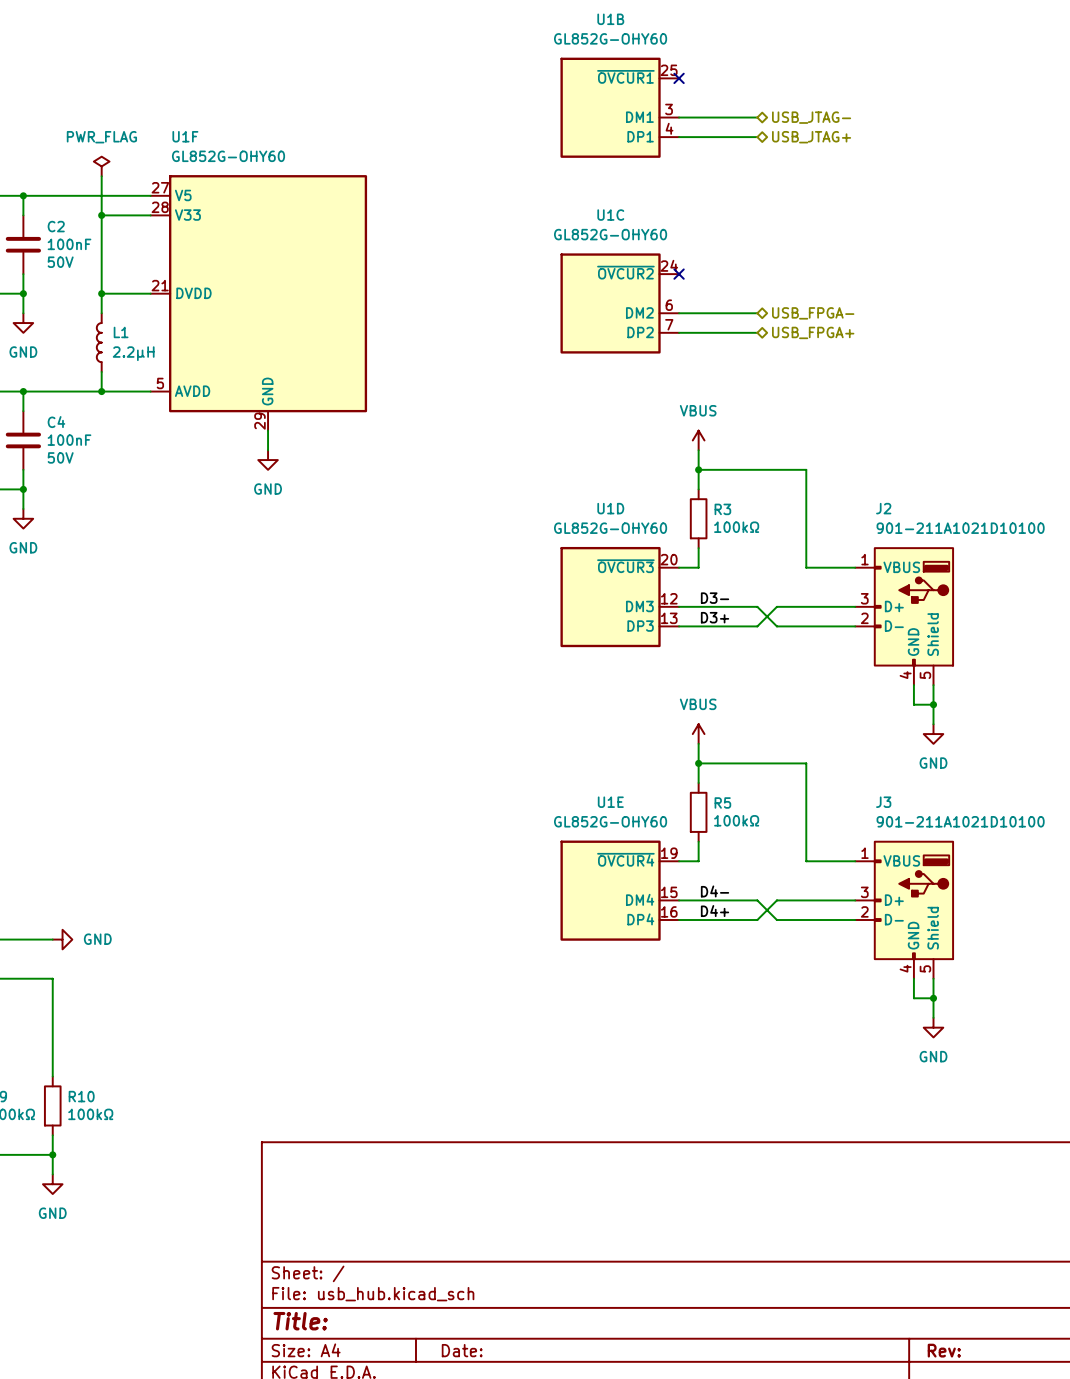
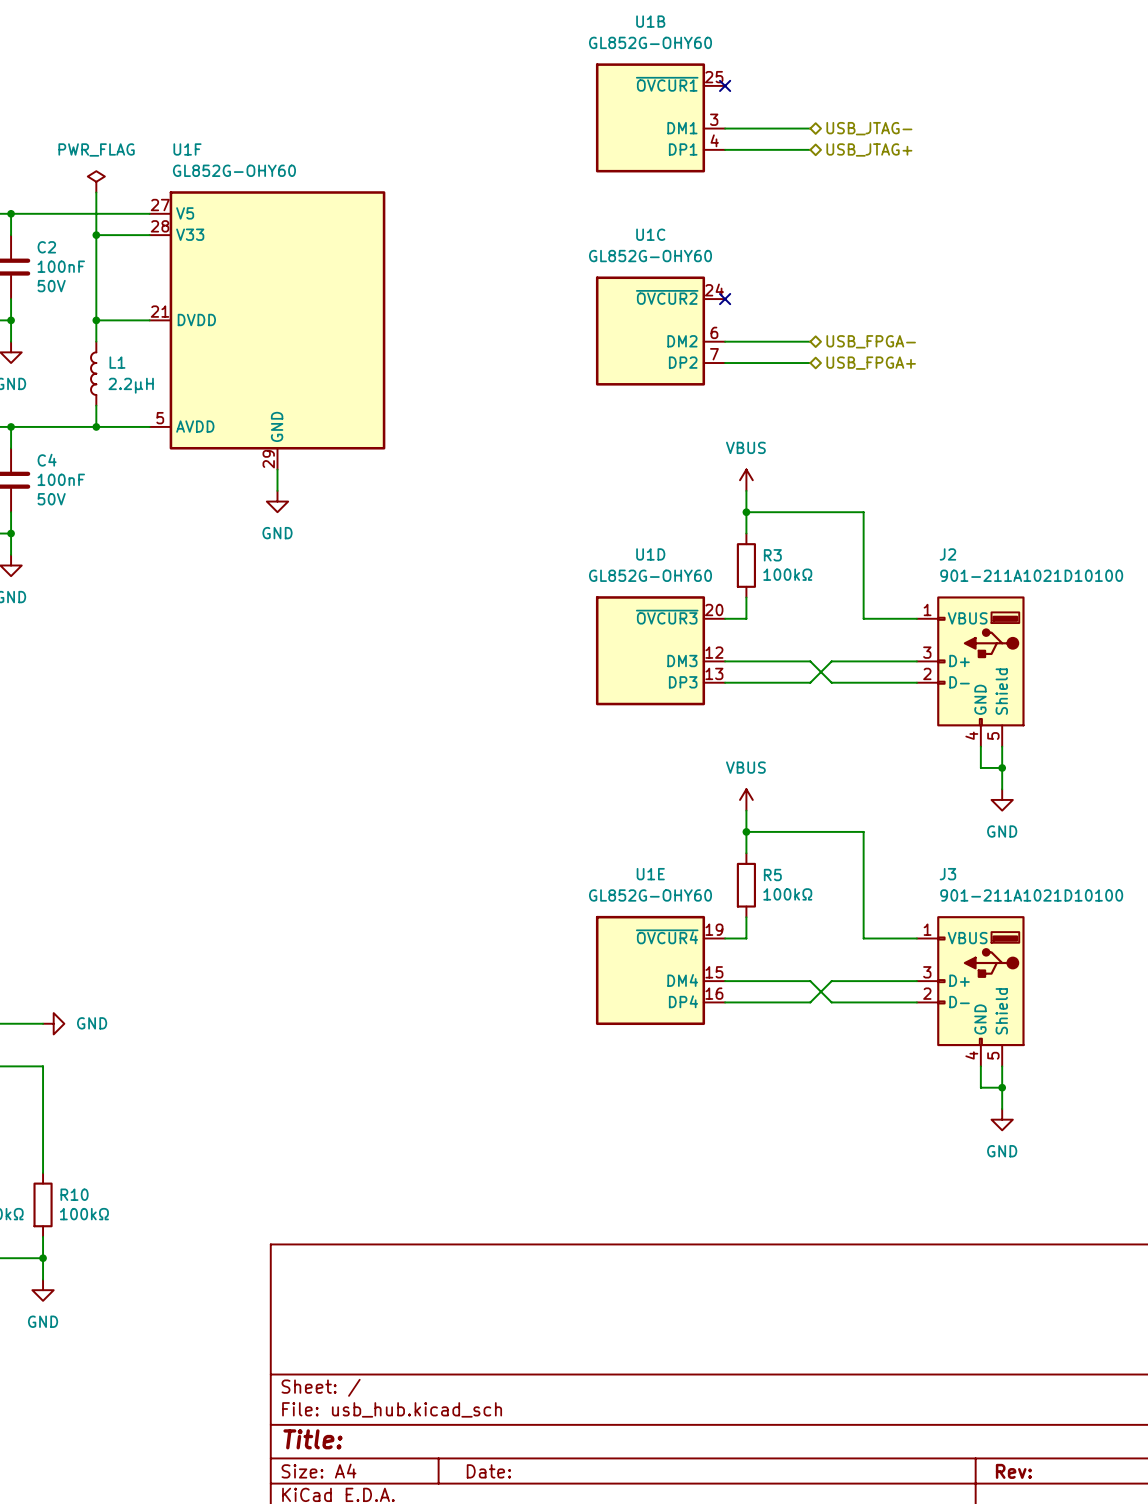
label: D3- (715, 598) -> none
label: D3+ (715, 617) -> none
label: D4- (715, 891) -> none
label: D4+ (715, 911) -> none

